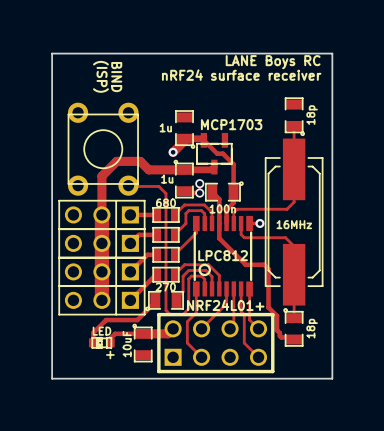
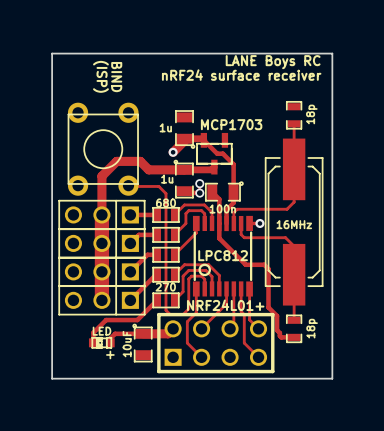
part footprint: [285, 97, 305, 136] -> [286, 101, 303, 130]
part footprint: [145, 291, 184, 311] -> [152, 292, 180, 309]
part footprint: [283, 308, 304, 347] -> [286, 314, 303, 343]

